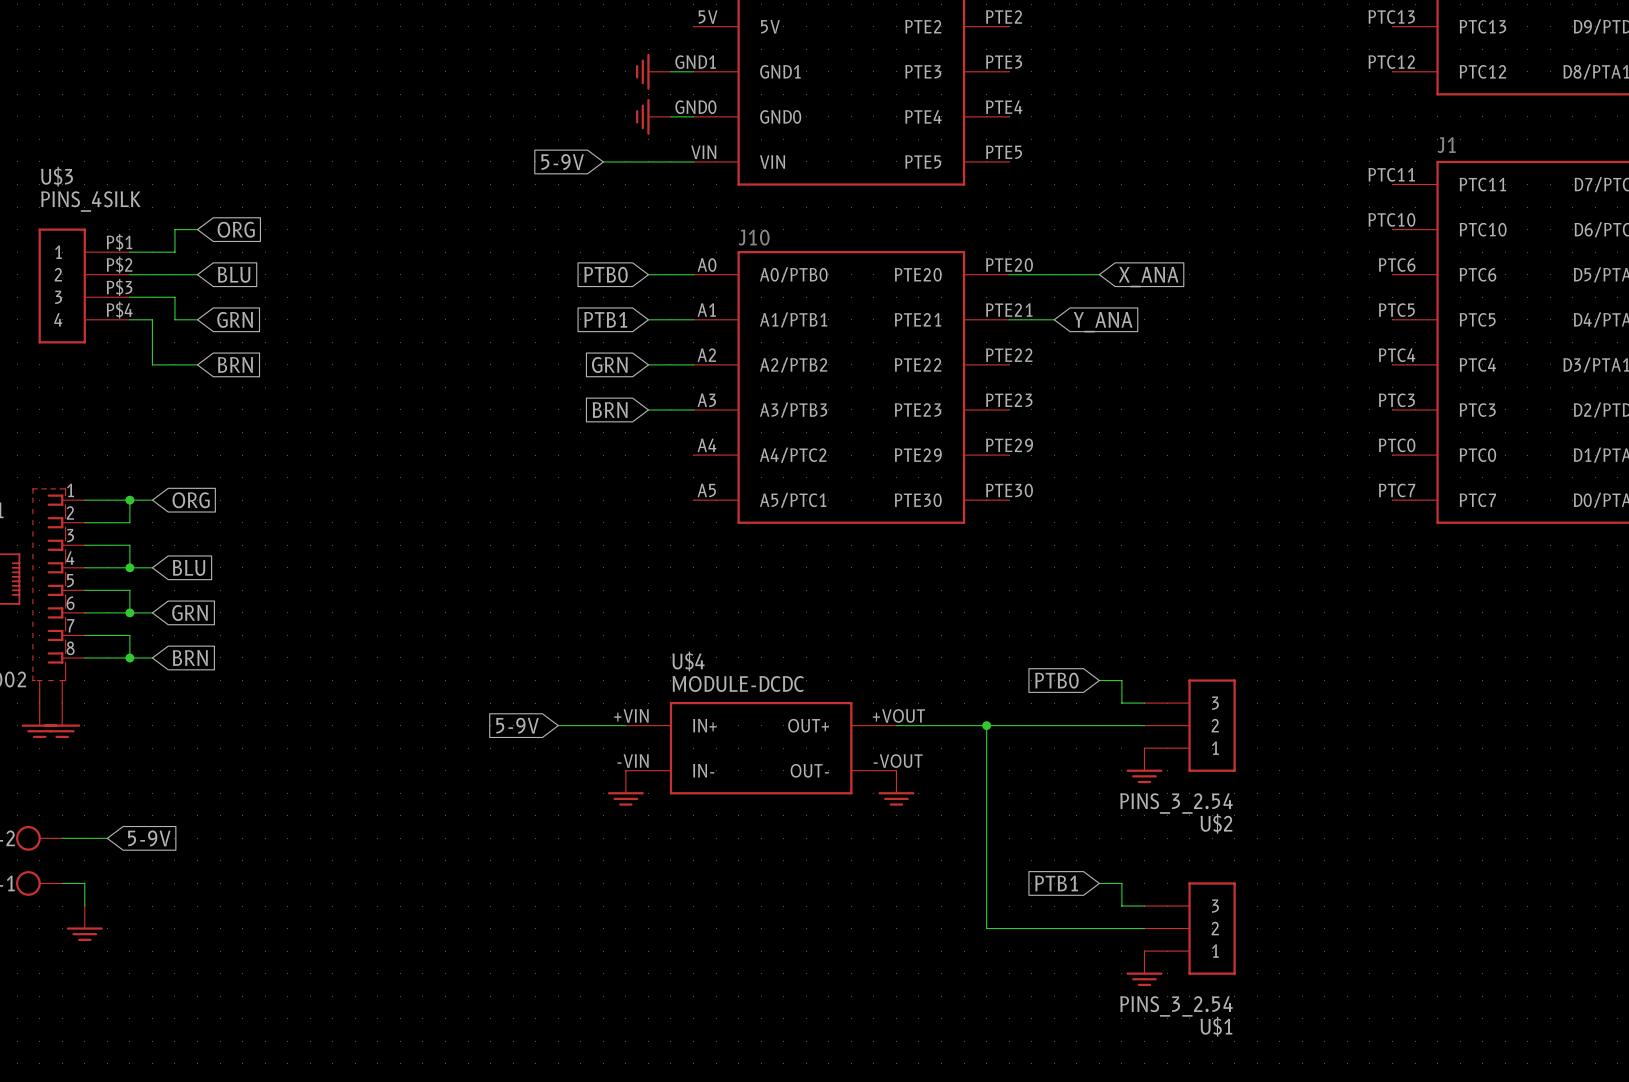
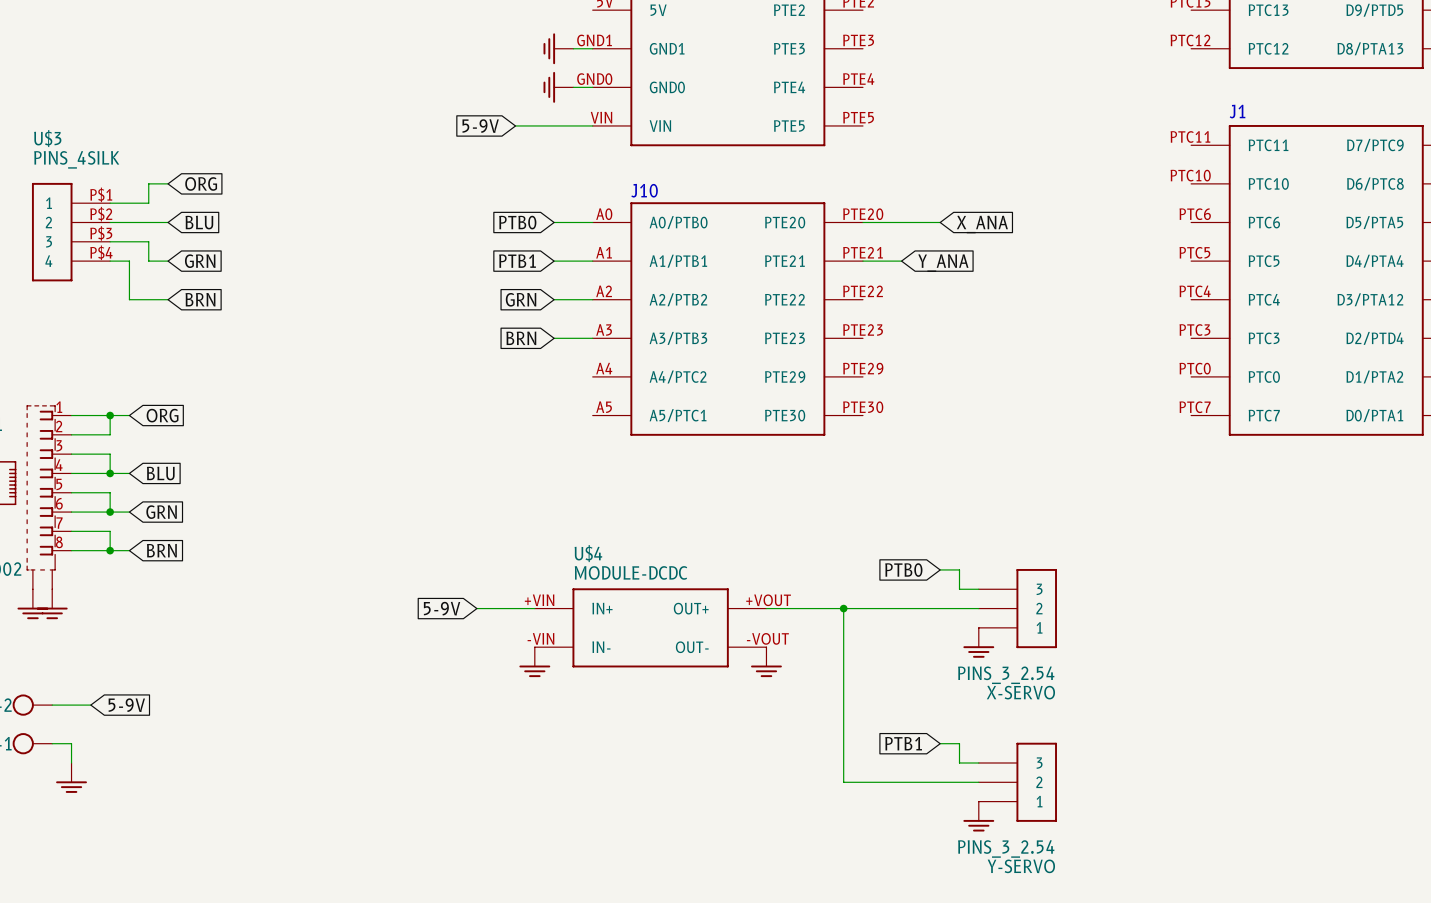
U$2 name: U$2 (1216, 823) -> X-SERVO (1020, 692)
U$1 name: U$1 (1216, 1026) -> Y-SERVO (1021, 866)

